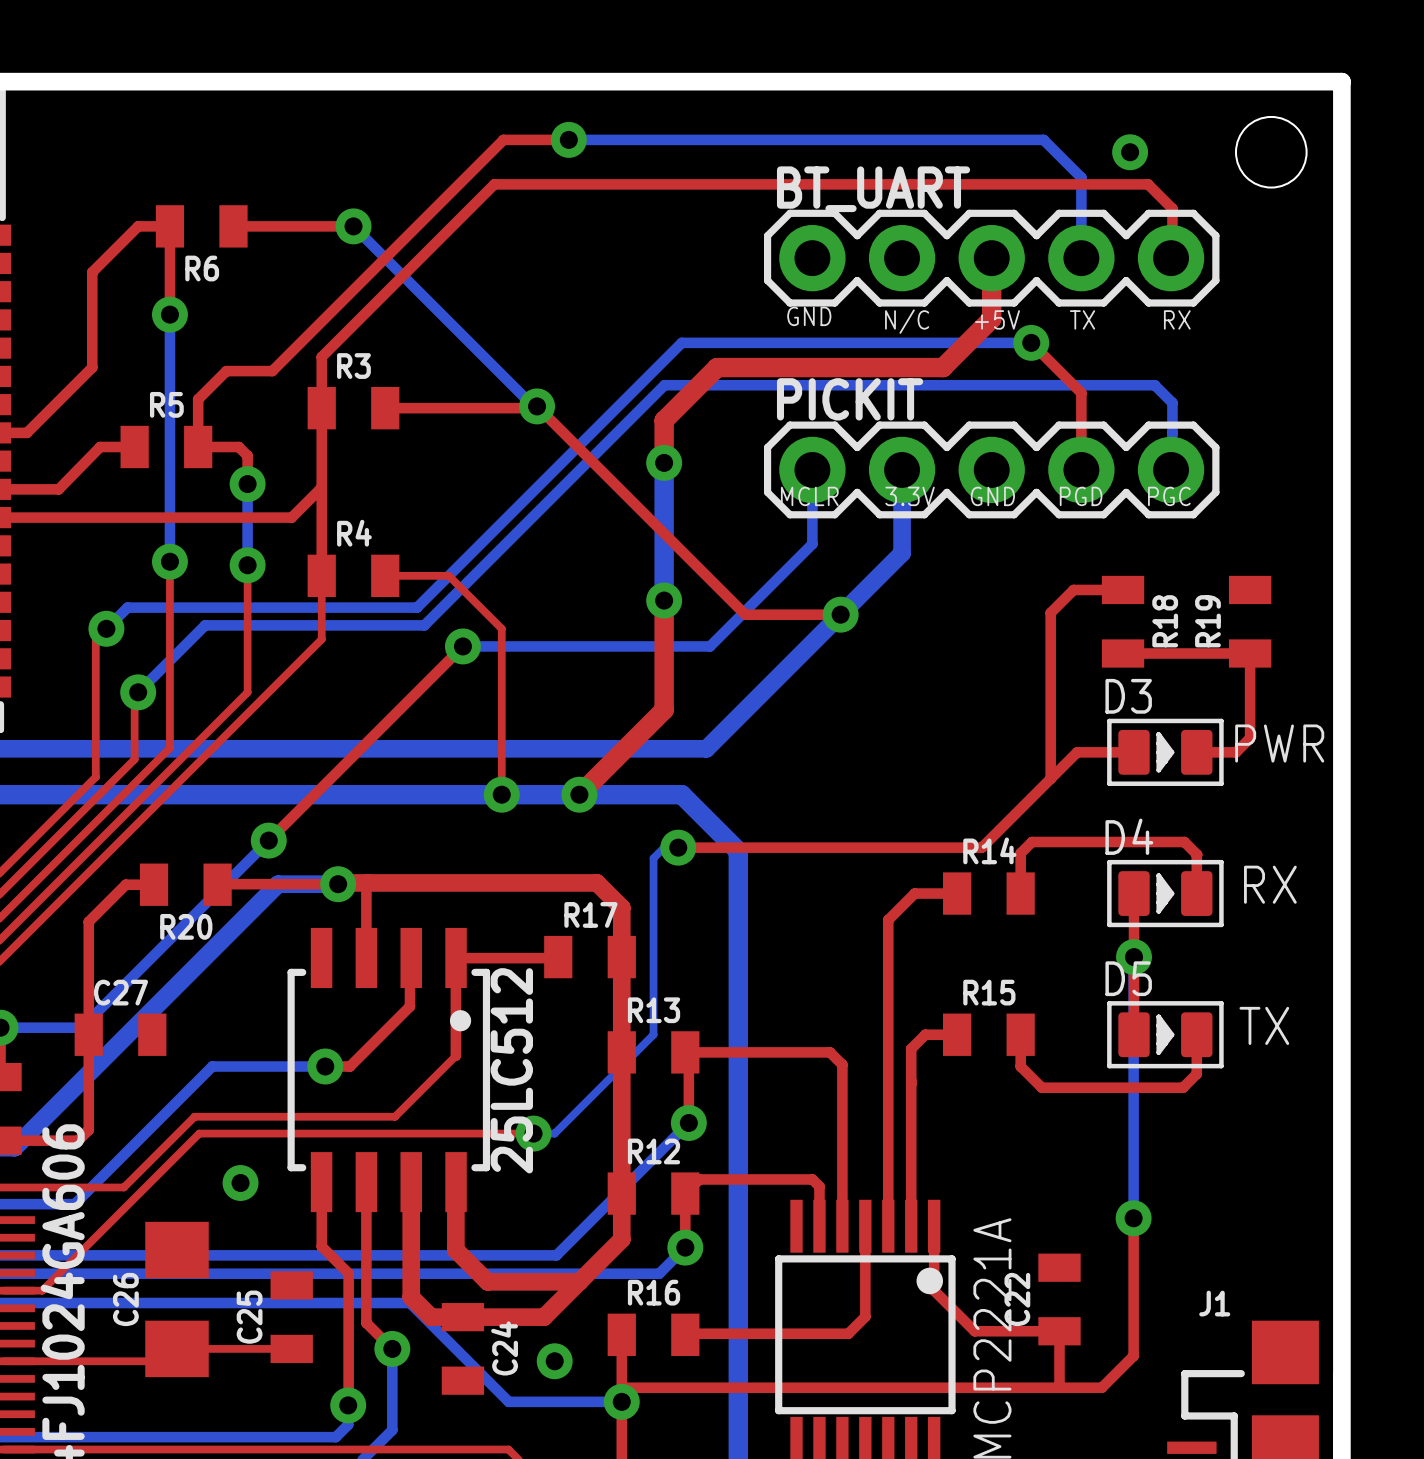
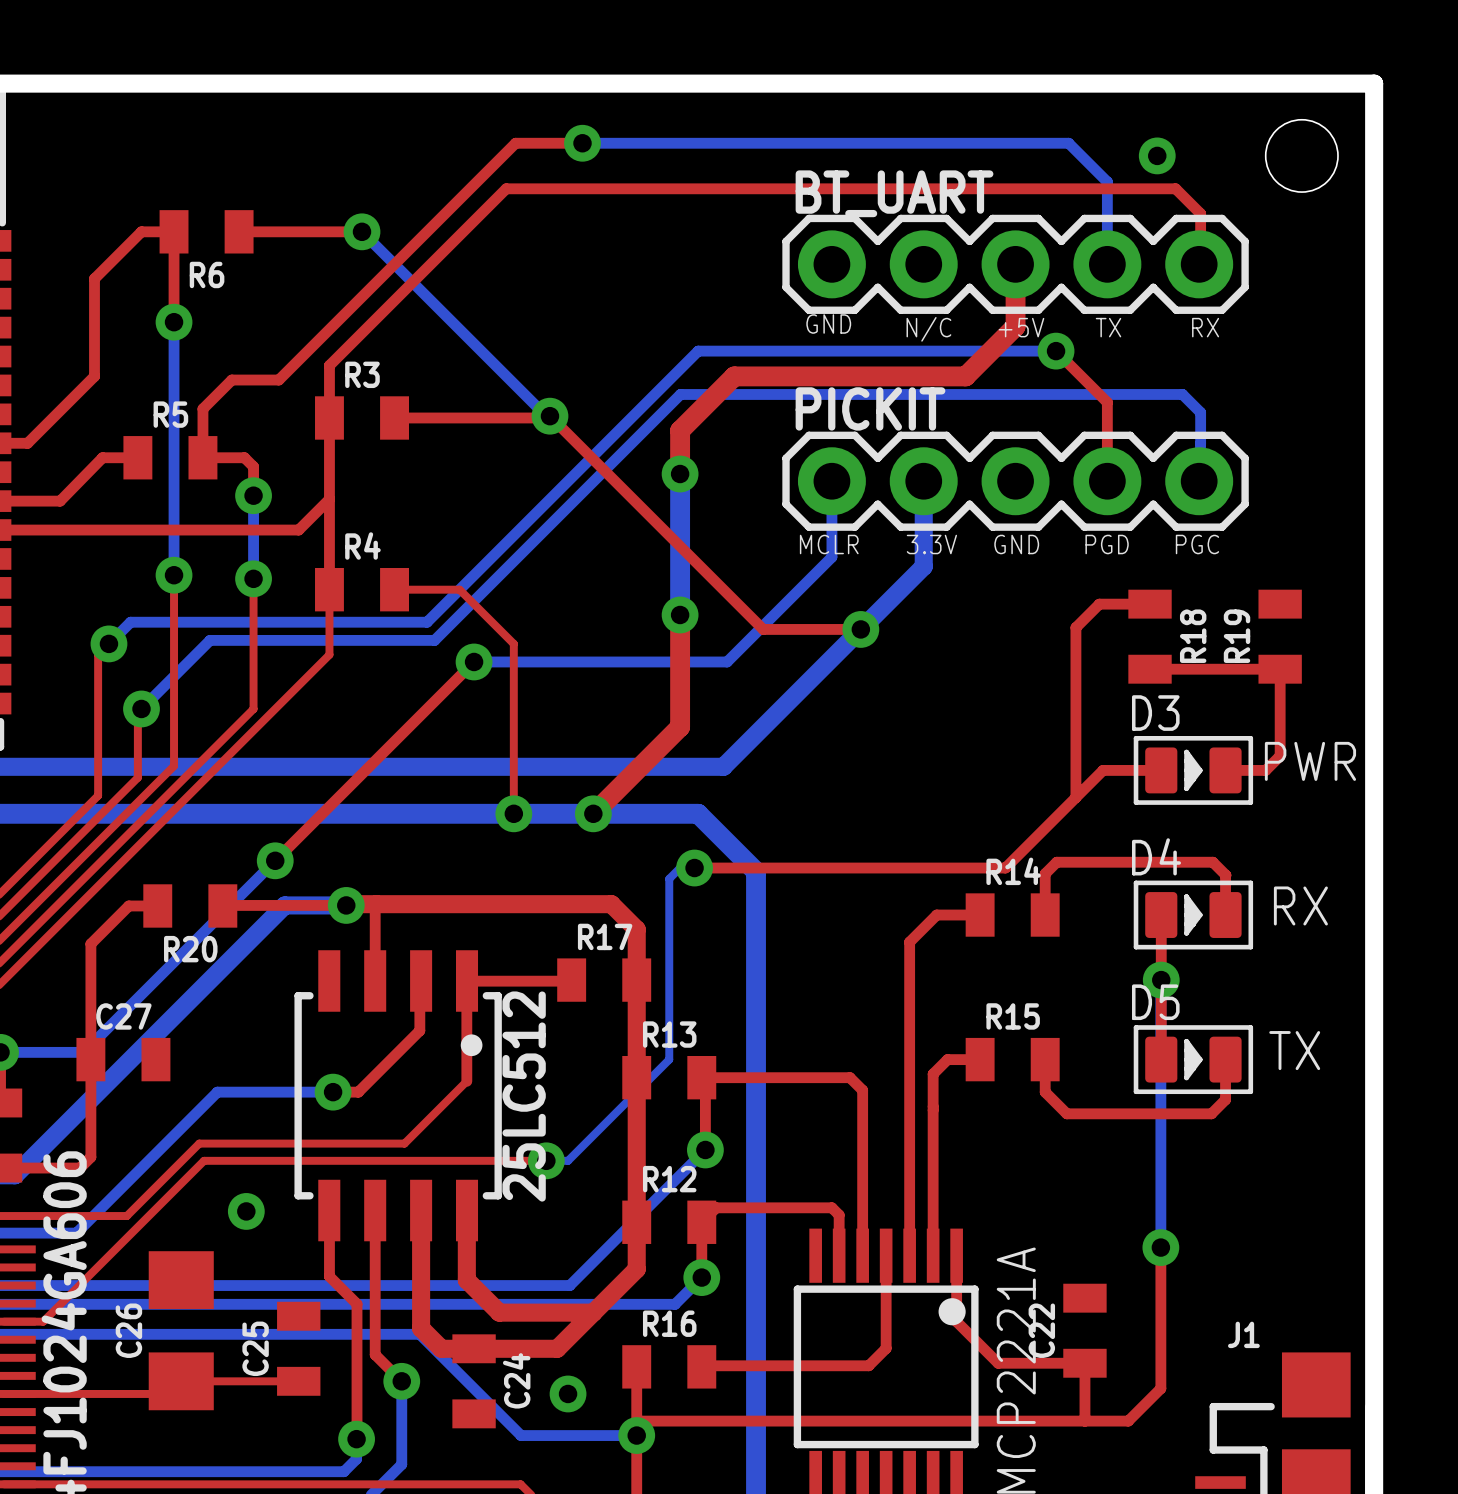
text position: MCLR (809, 496) -> MCLR (829, 544)
text position: 3.3V (910, 496) -> 3.3V (931, 544)
text position: GND (992, 496) -> GND (1016, 544)
text position: PGD (1081, 496) -> PGD (1107, 544)
text position: PGC (1169, 496) -> PGC (1197, 544)

